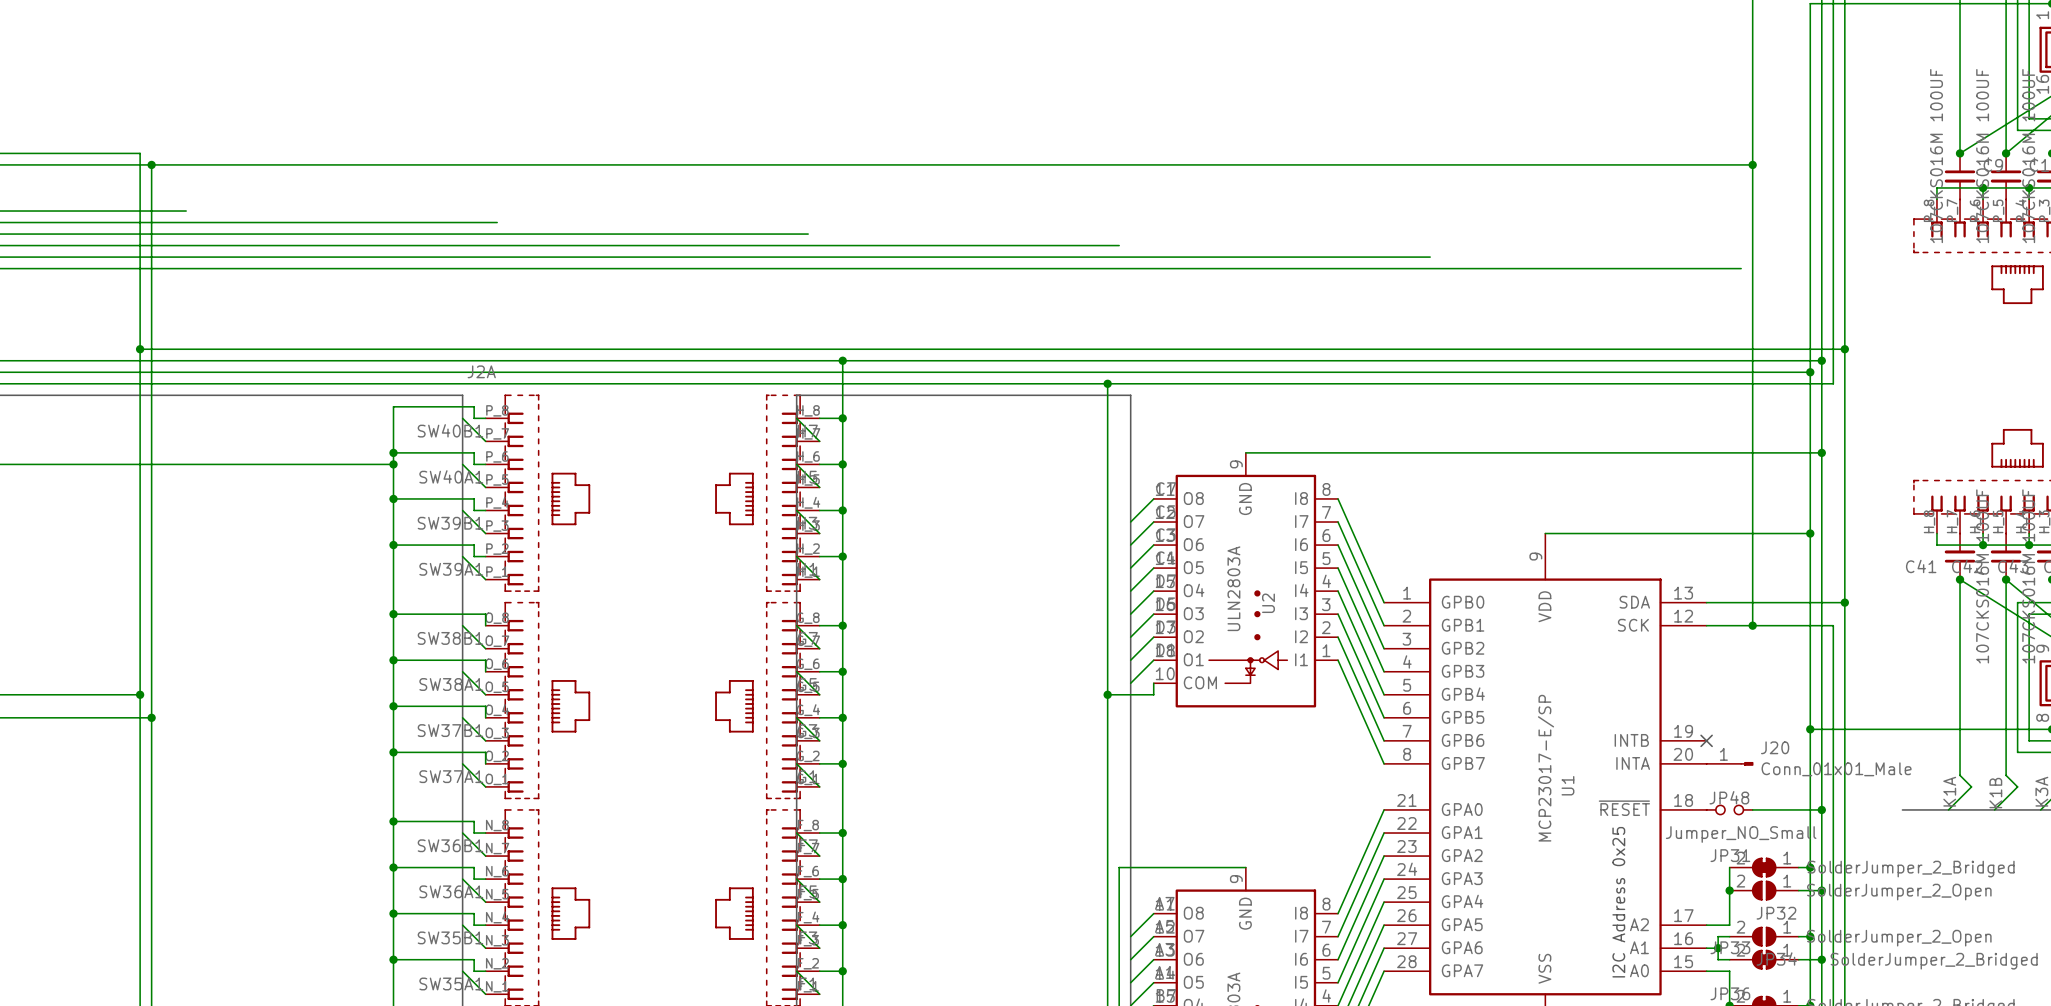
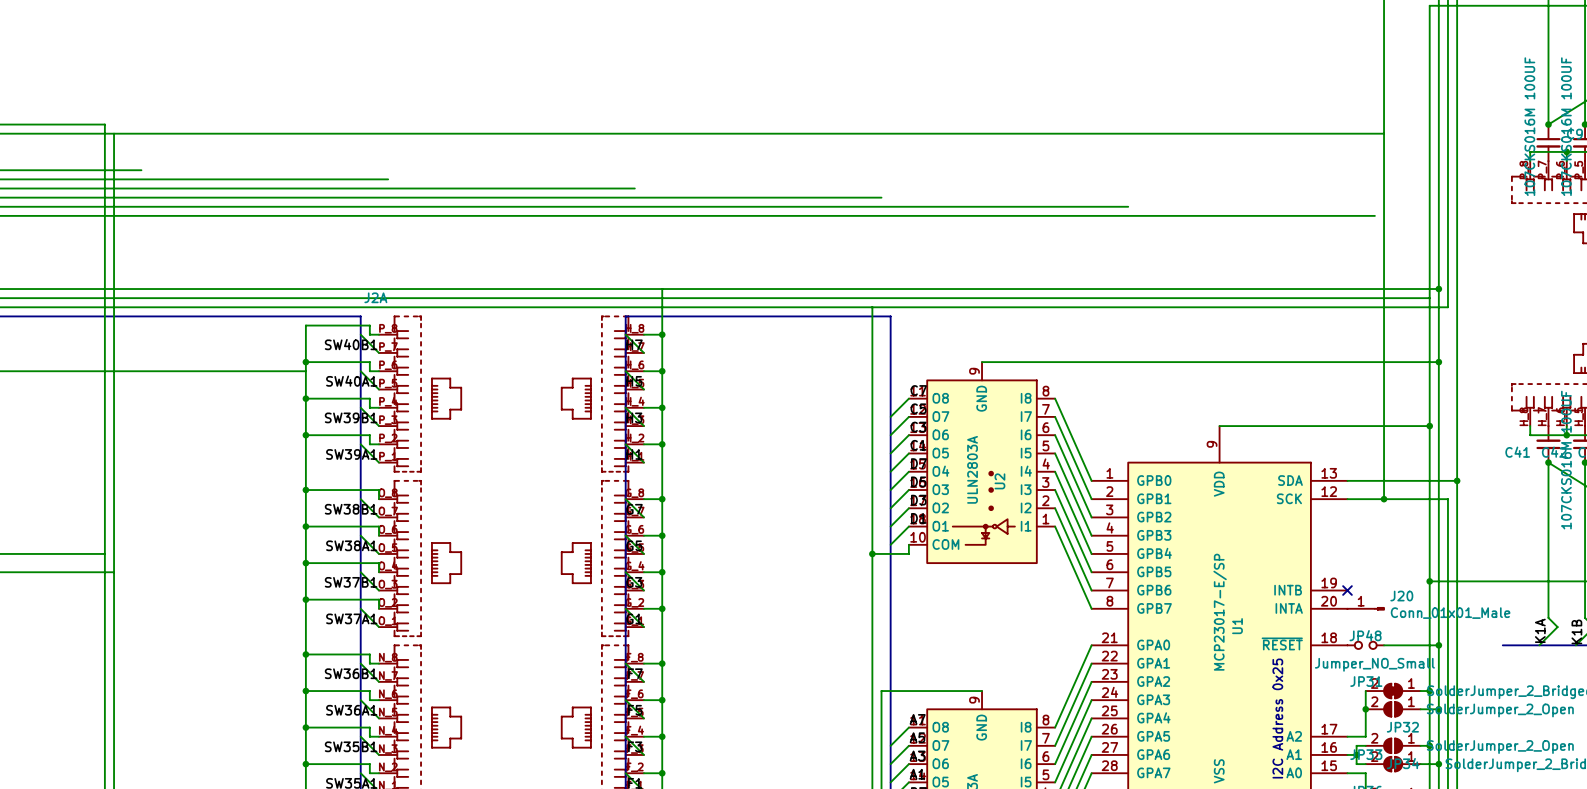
junction: (151, 164) -> none
junction: (1752, 164) -> none
wire: (140, 349) (1844, 349) -> none
junction: (140, 349) -> none
junction: (1844, 349) -> none
junction: (842, 360) -> none
junction: (1810, 372) -> none
junction: (1107, 383) -> none
junction: (393, 464) -> none
junction: (140, 694) -> none
junction: (151, 717) -> none

